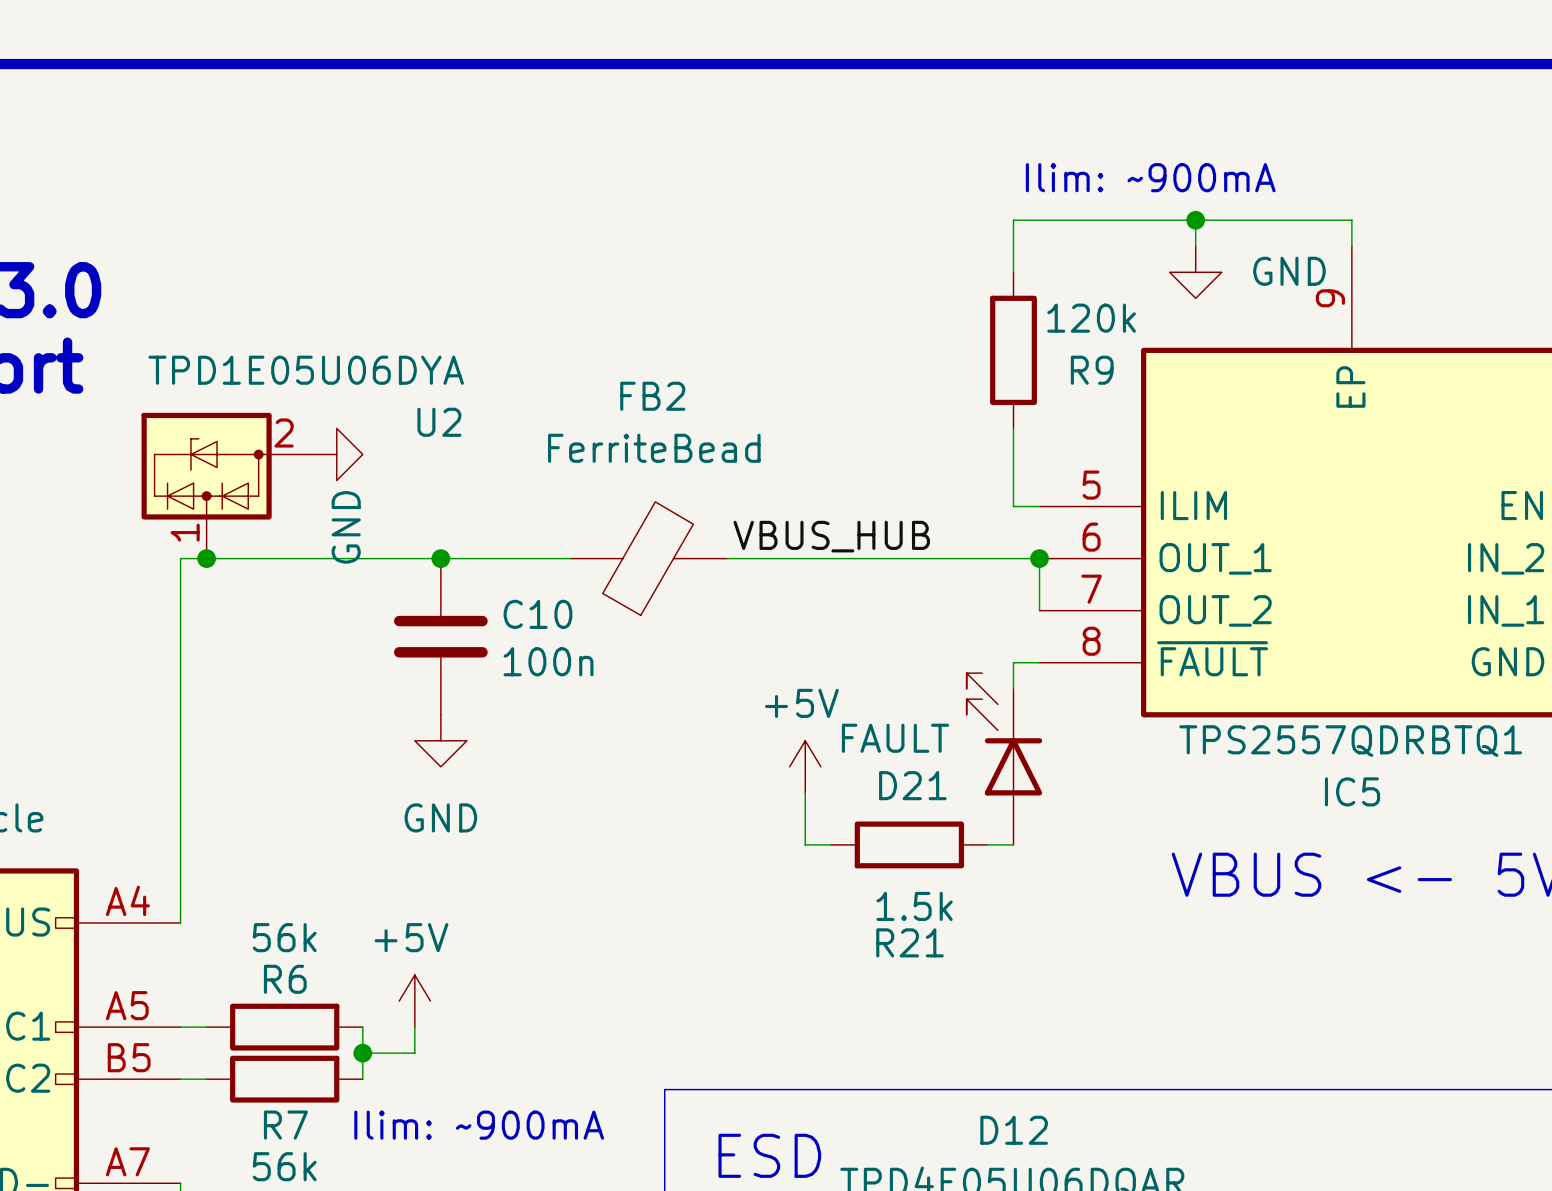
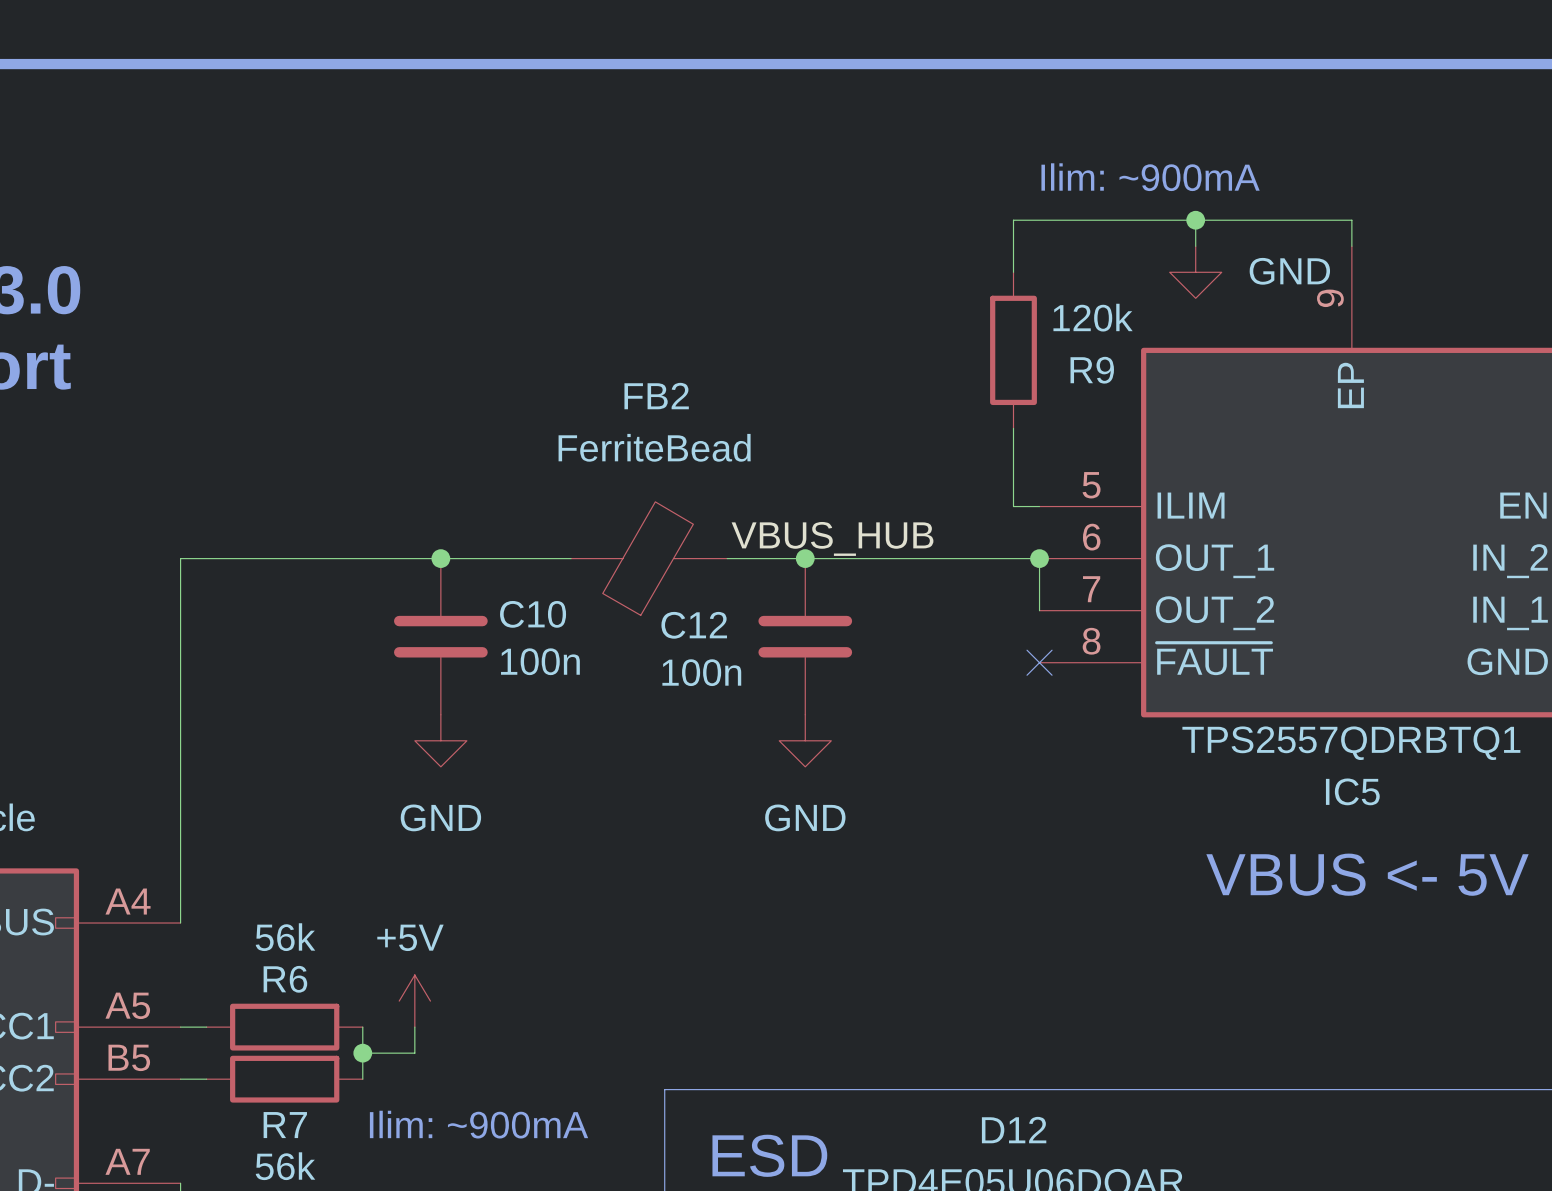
power symbol: GND (336, 454) -> none
U2: TPD1E05U06DYA (226, 485) -> none
junction: (206, 558) -> none
junction: none -> (805, 558)
C12: none -> 100n (805, 636)
wire: (1039, 662) (1013, 662) (1013, 688) -> none
no-connect mark: none -> (1039, 662)
power symbol: none -> GND (805, 740)
D21: FAULT (1004, 759) -> none
power symbol: +5V (805, 766) -> none
wire: (805, 792) (805, 844) (831, 844) -> none
R21: 1.5k (909, 844) -> none
wire: (987, 844) (1013, 844) -> none

